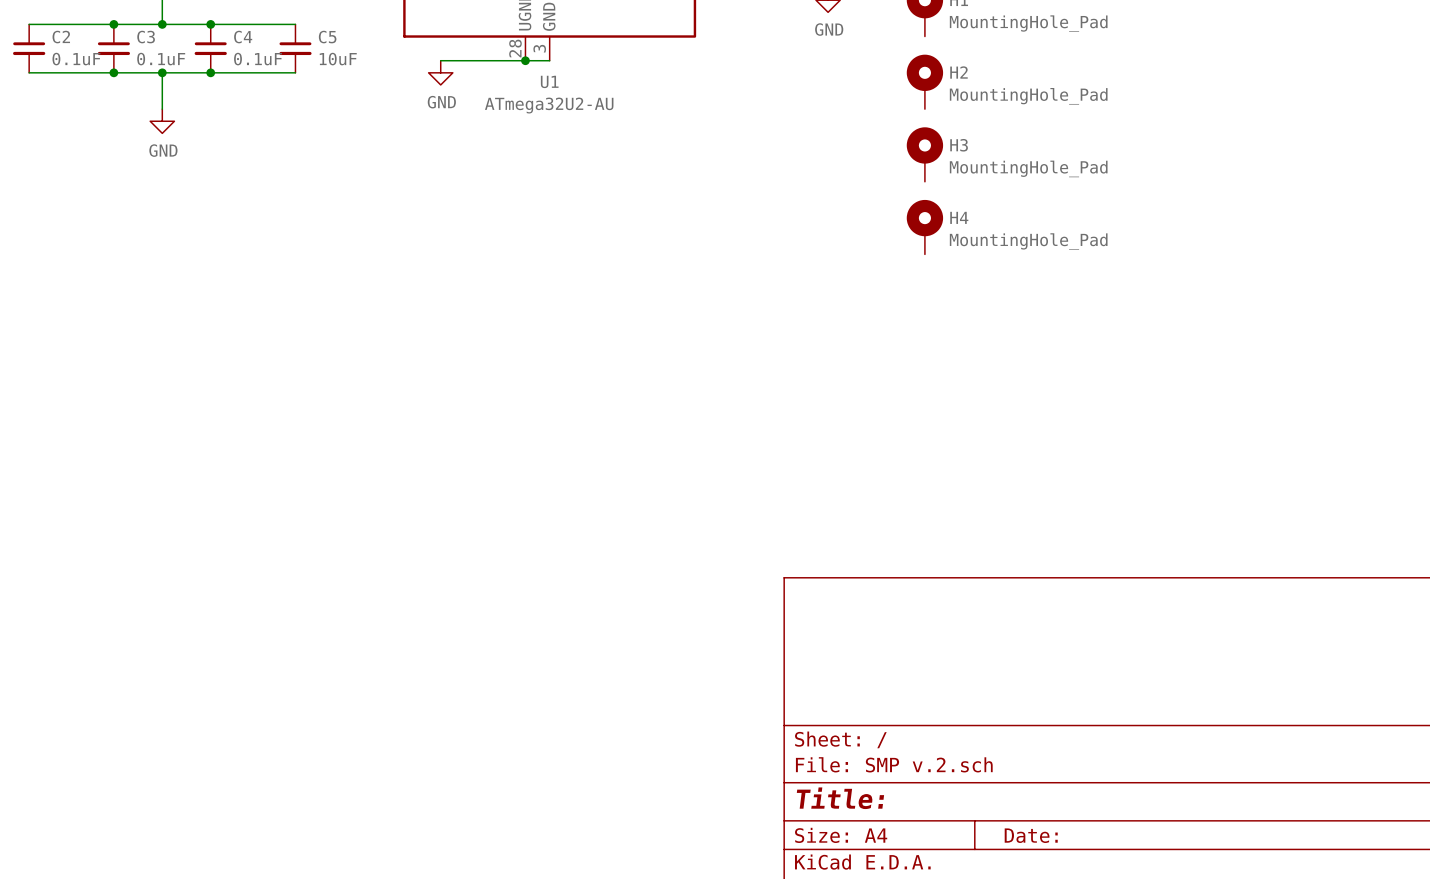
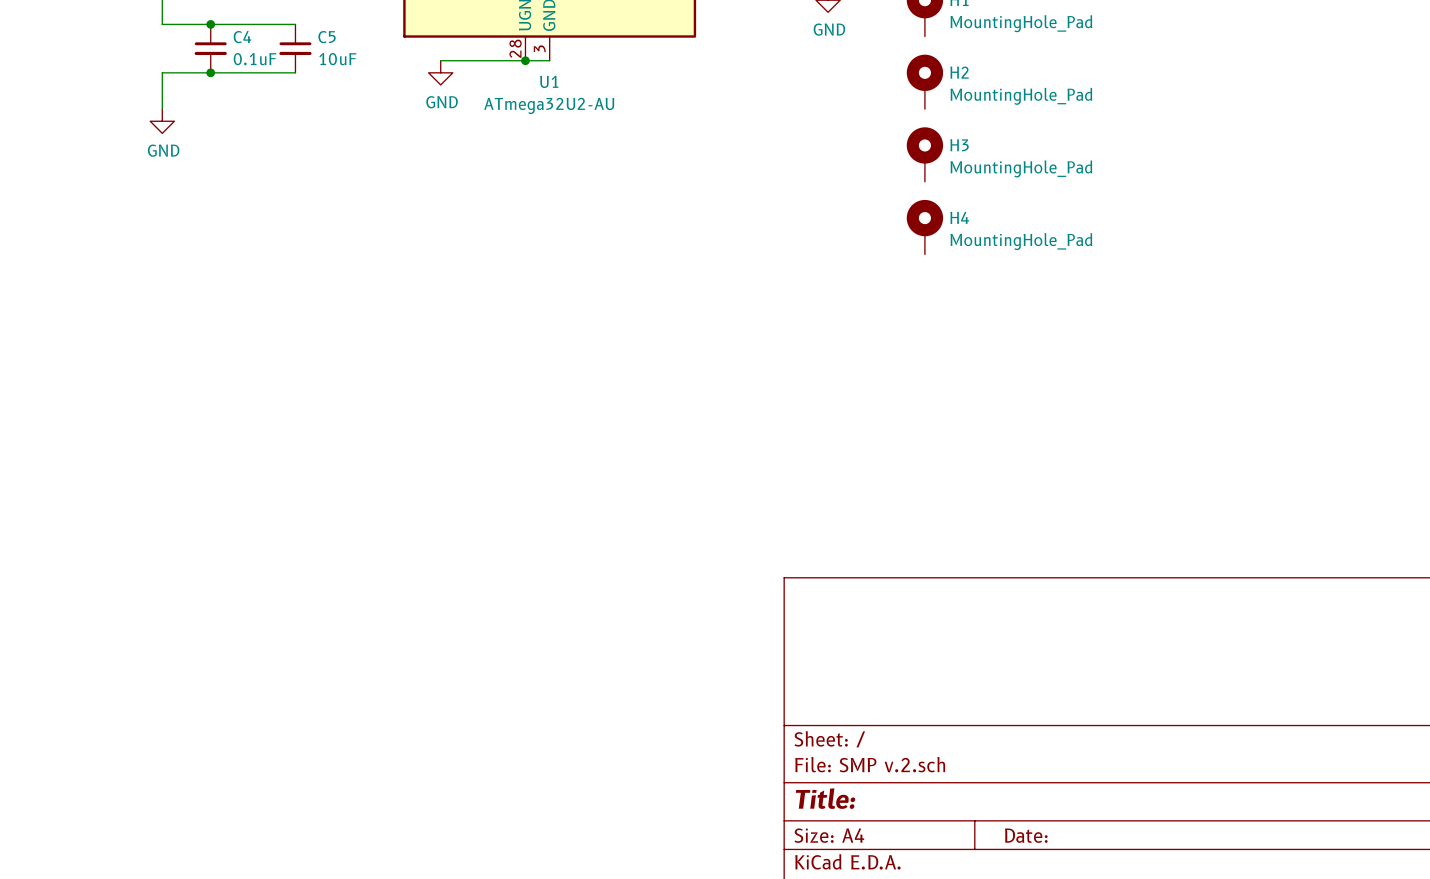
wire: (29, 24) (162, 24) -> none
junction: (113, 24) -> none
junction: (162, 24) -> none
C2: 0.1uF (29, 48) -> none
C3: 0.1uF (113, 48) -> none
wire: (29, 72) (162, 72) -> none
junction: (113, 72) -> none
junction: (162, 72) -> none

